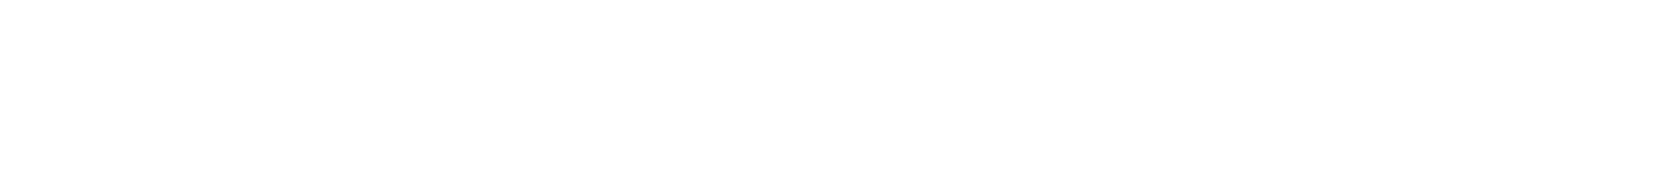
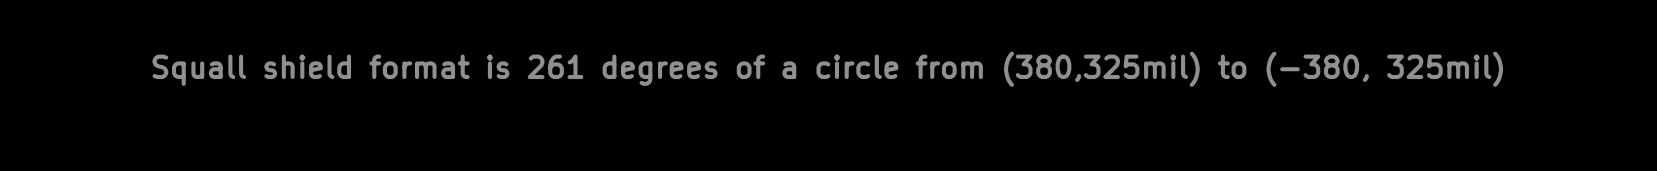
text: none -> Squall shield format is 261 degrees of a circle from (380,325mil) to (-380, 325mil) (827, 69)

